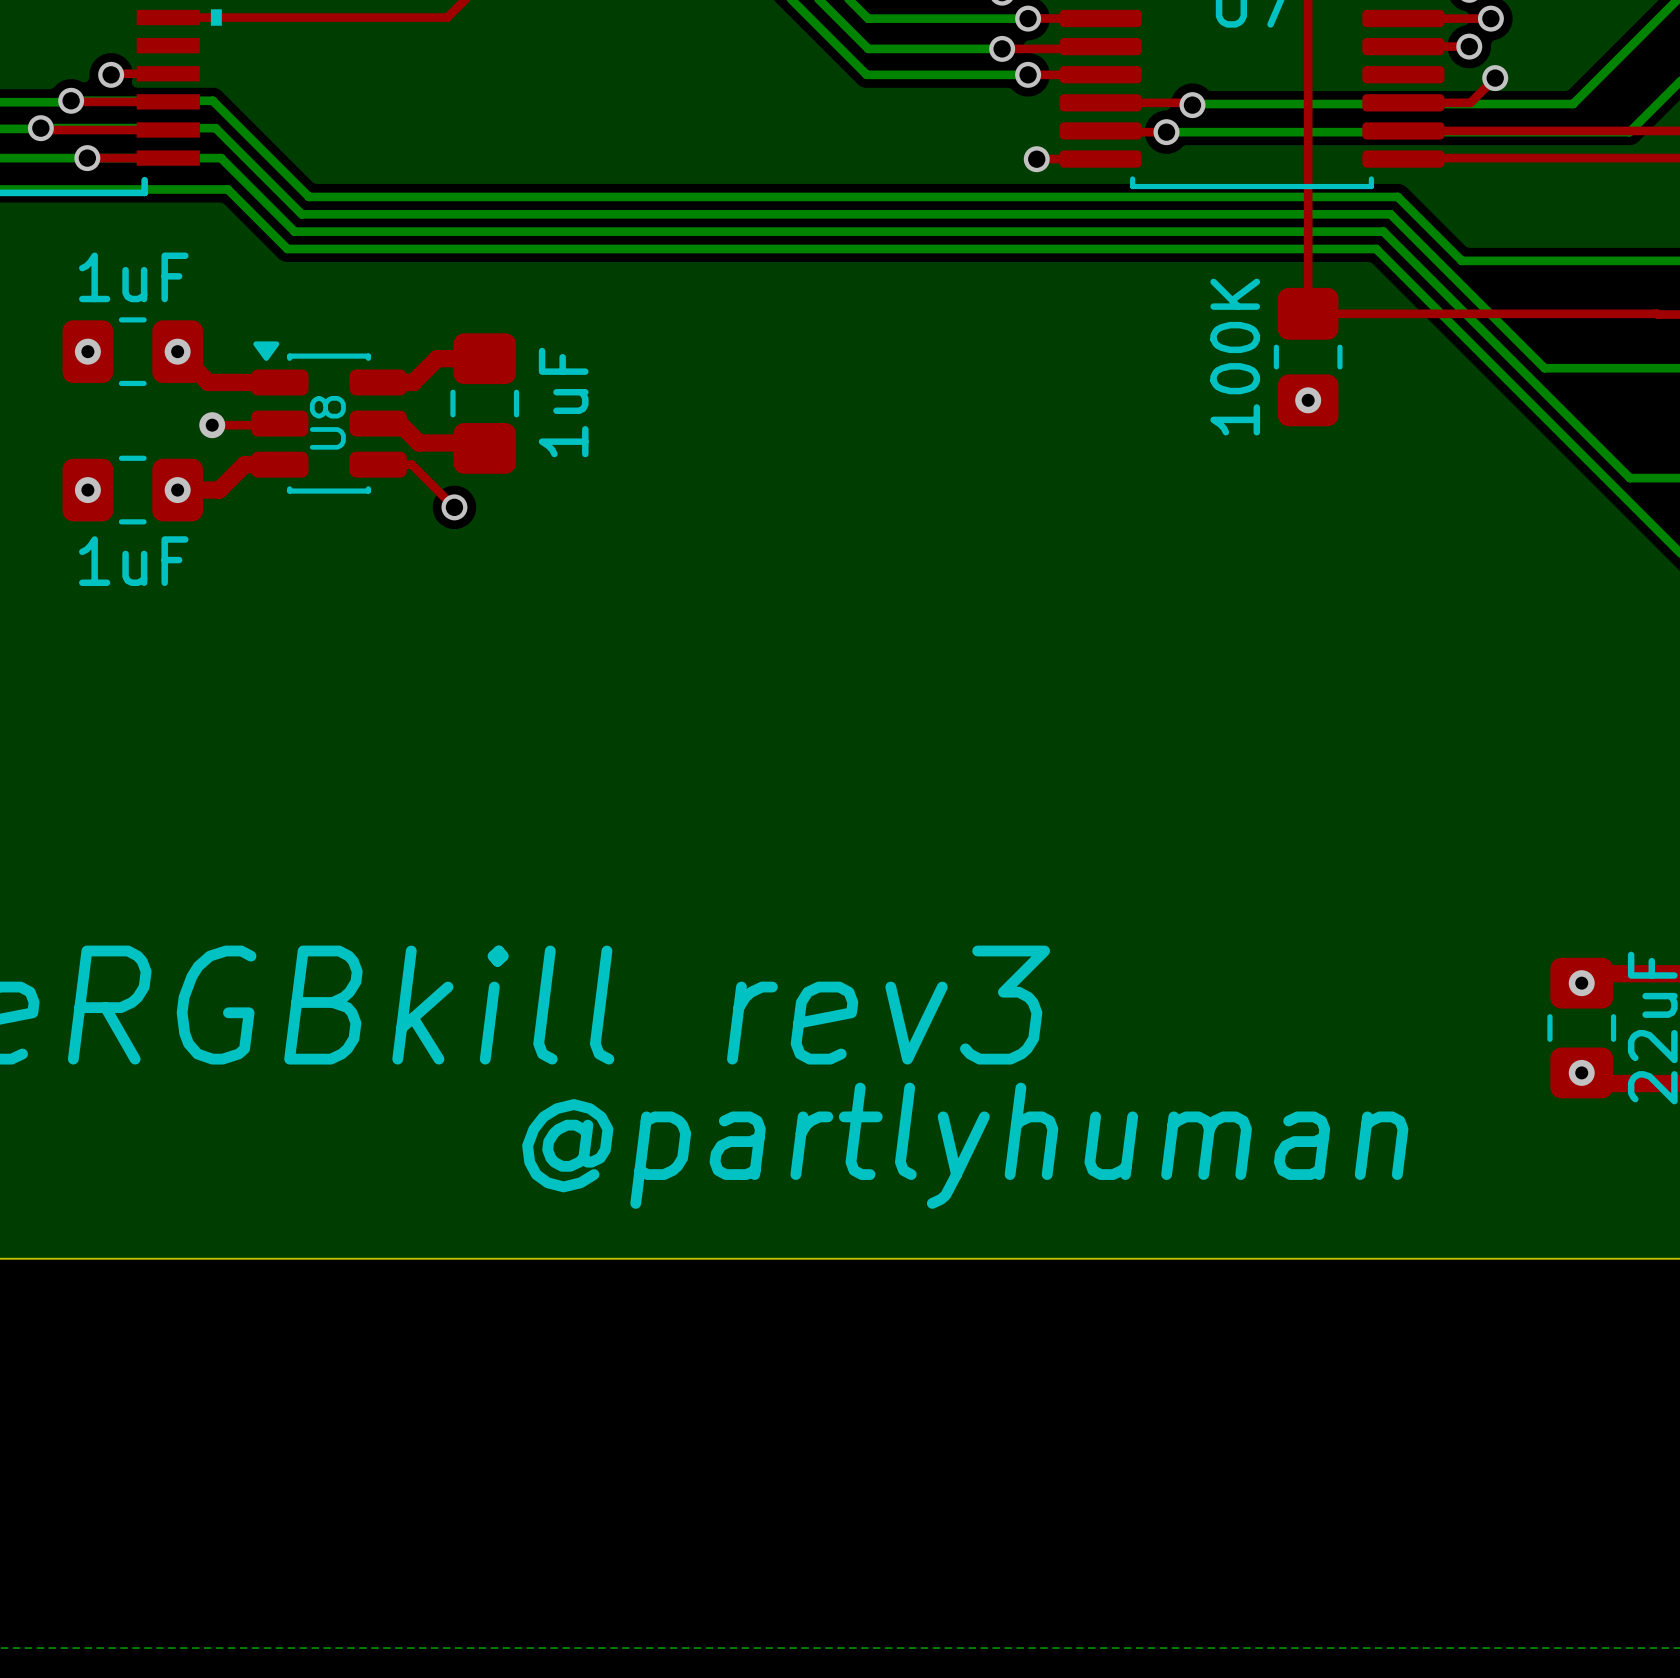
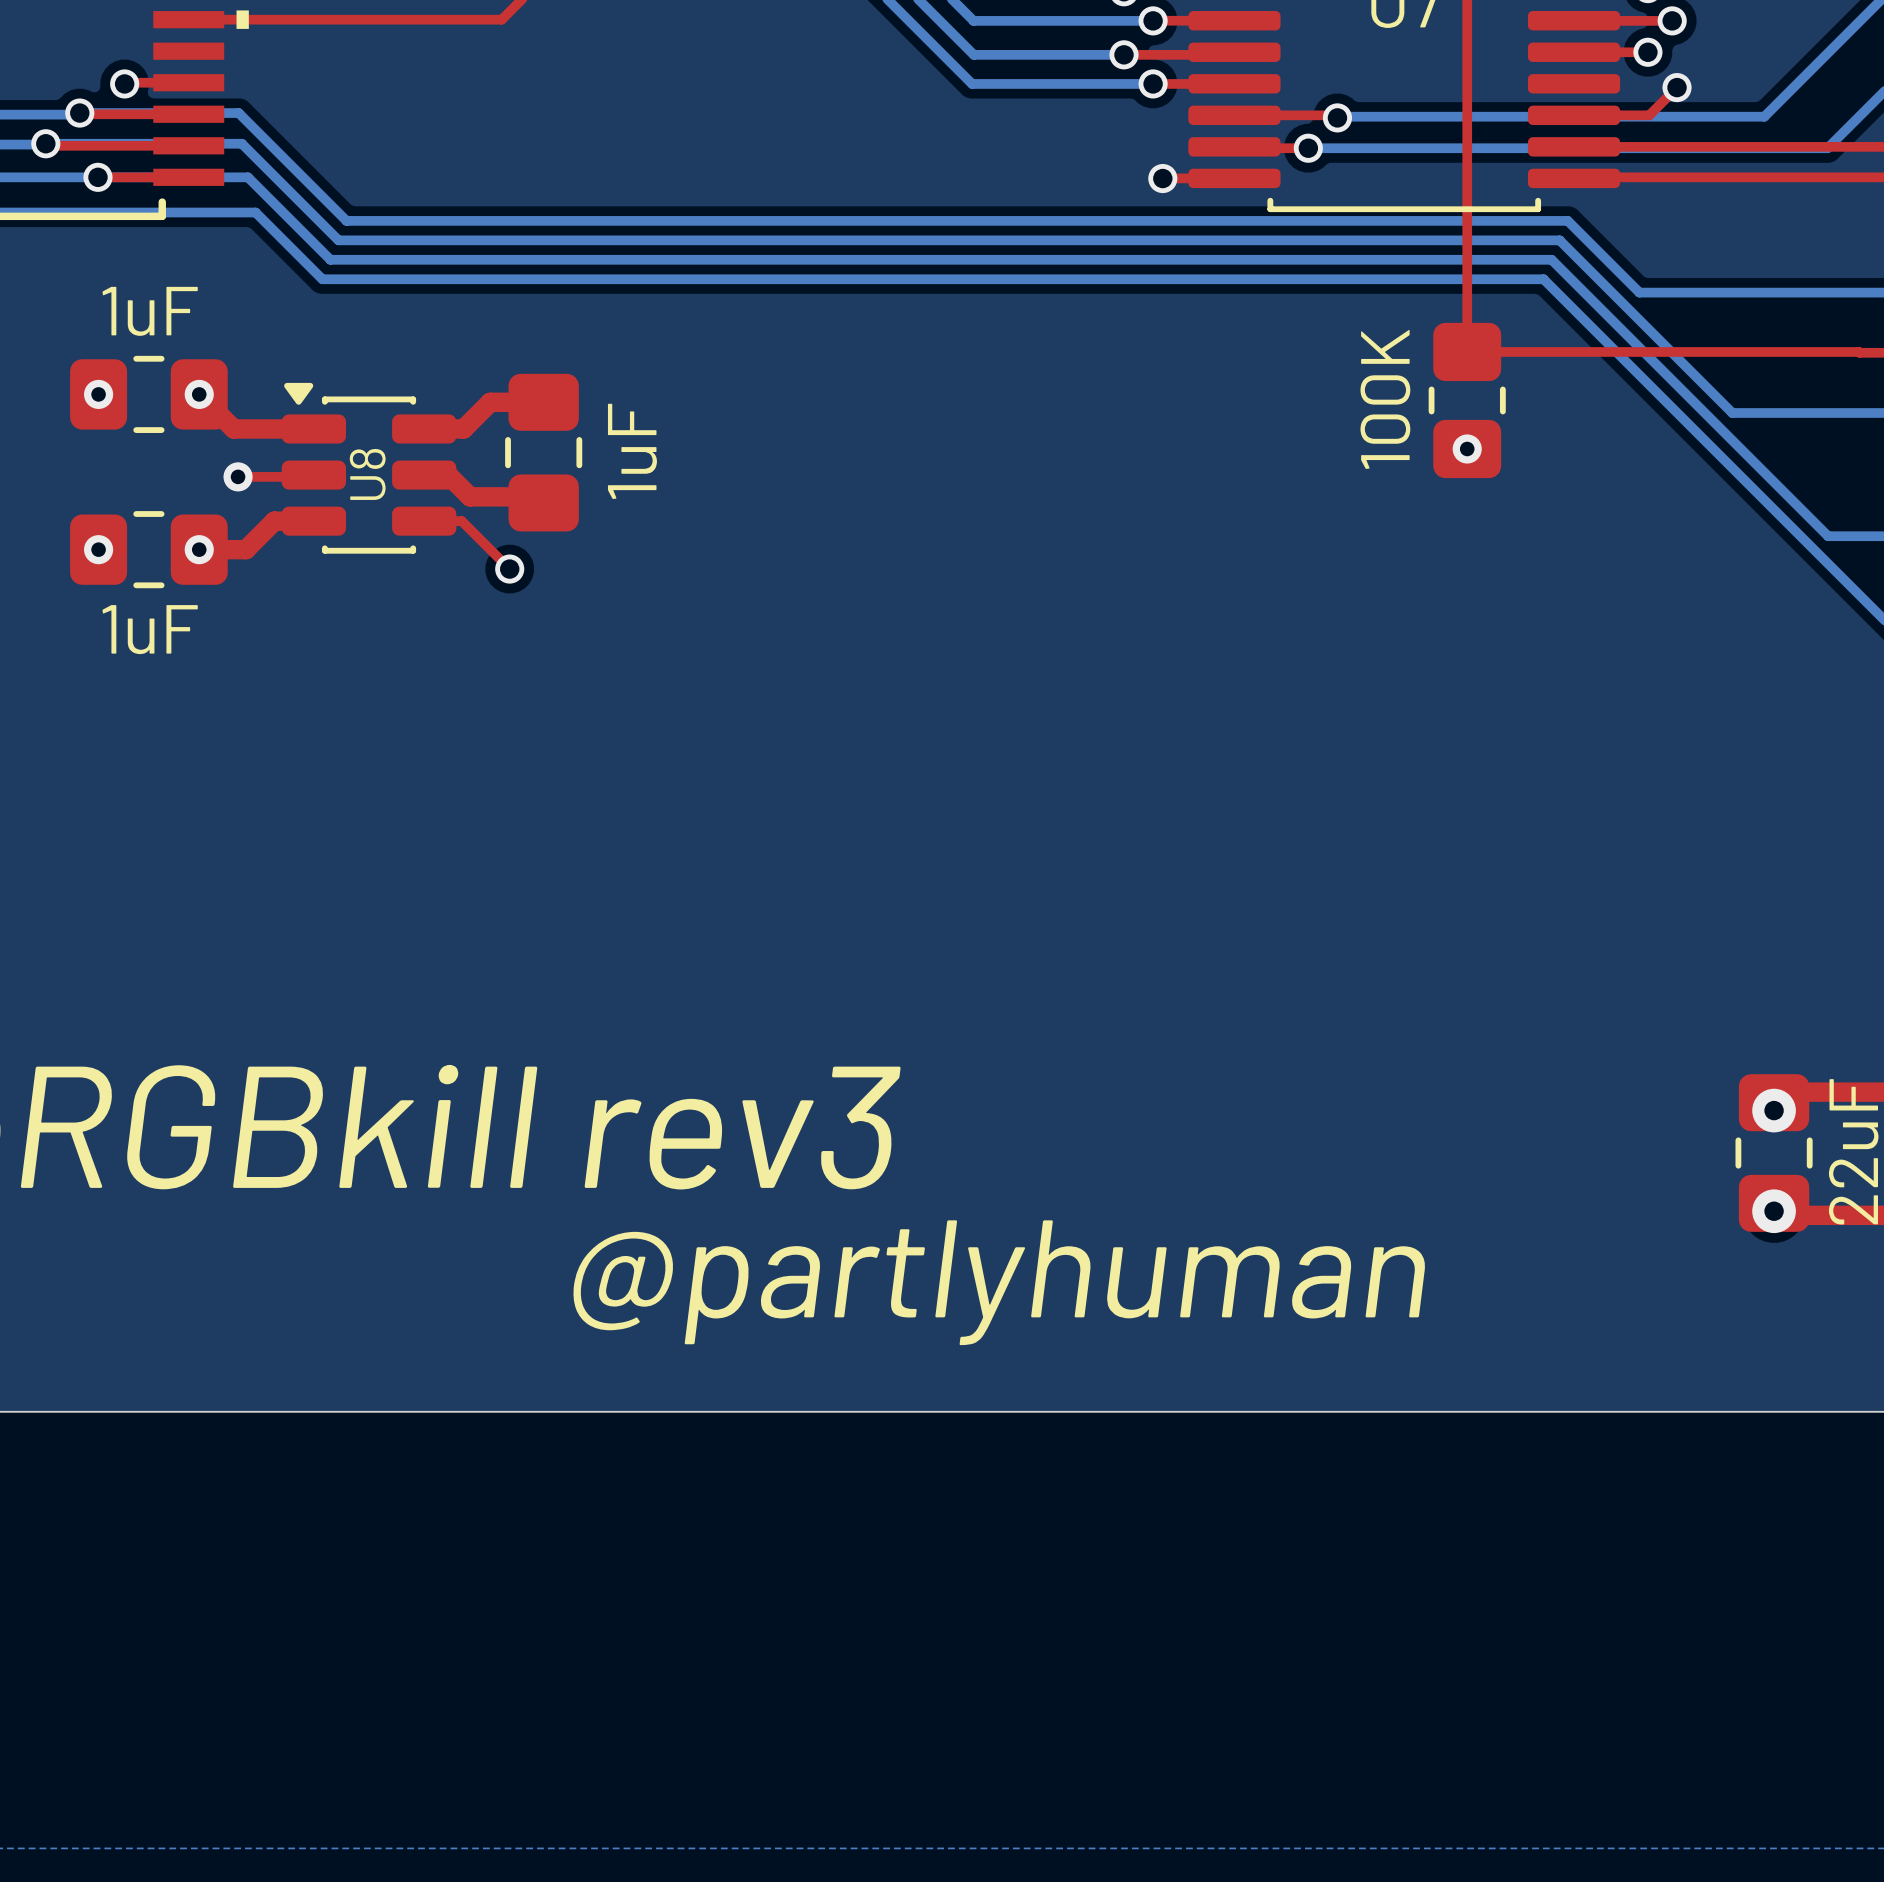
via size: [1568, 970, 1595, 997] -> [1752, 1088, 1796, 1133]
via size: [1568, 1059, 1595, 1086] -> [1752, 1189, 1796, 1234]

